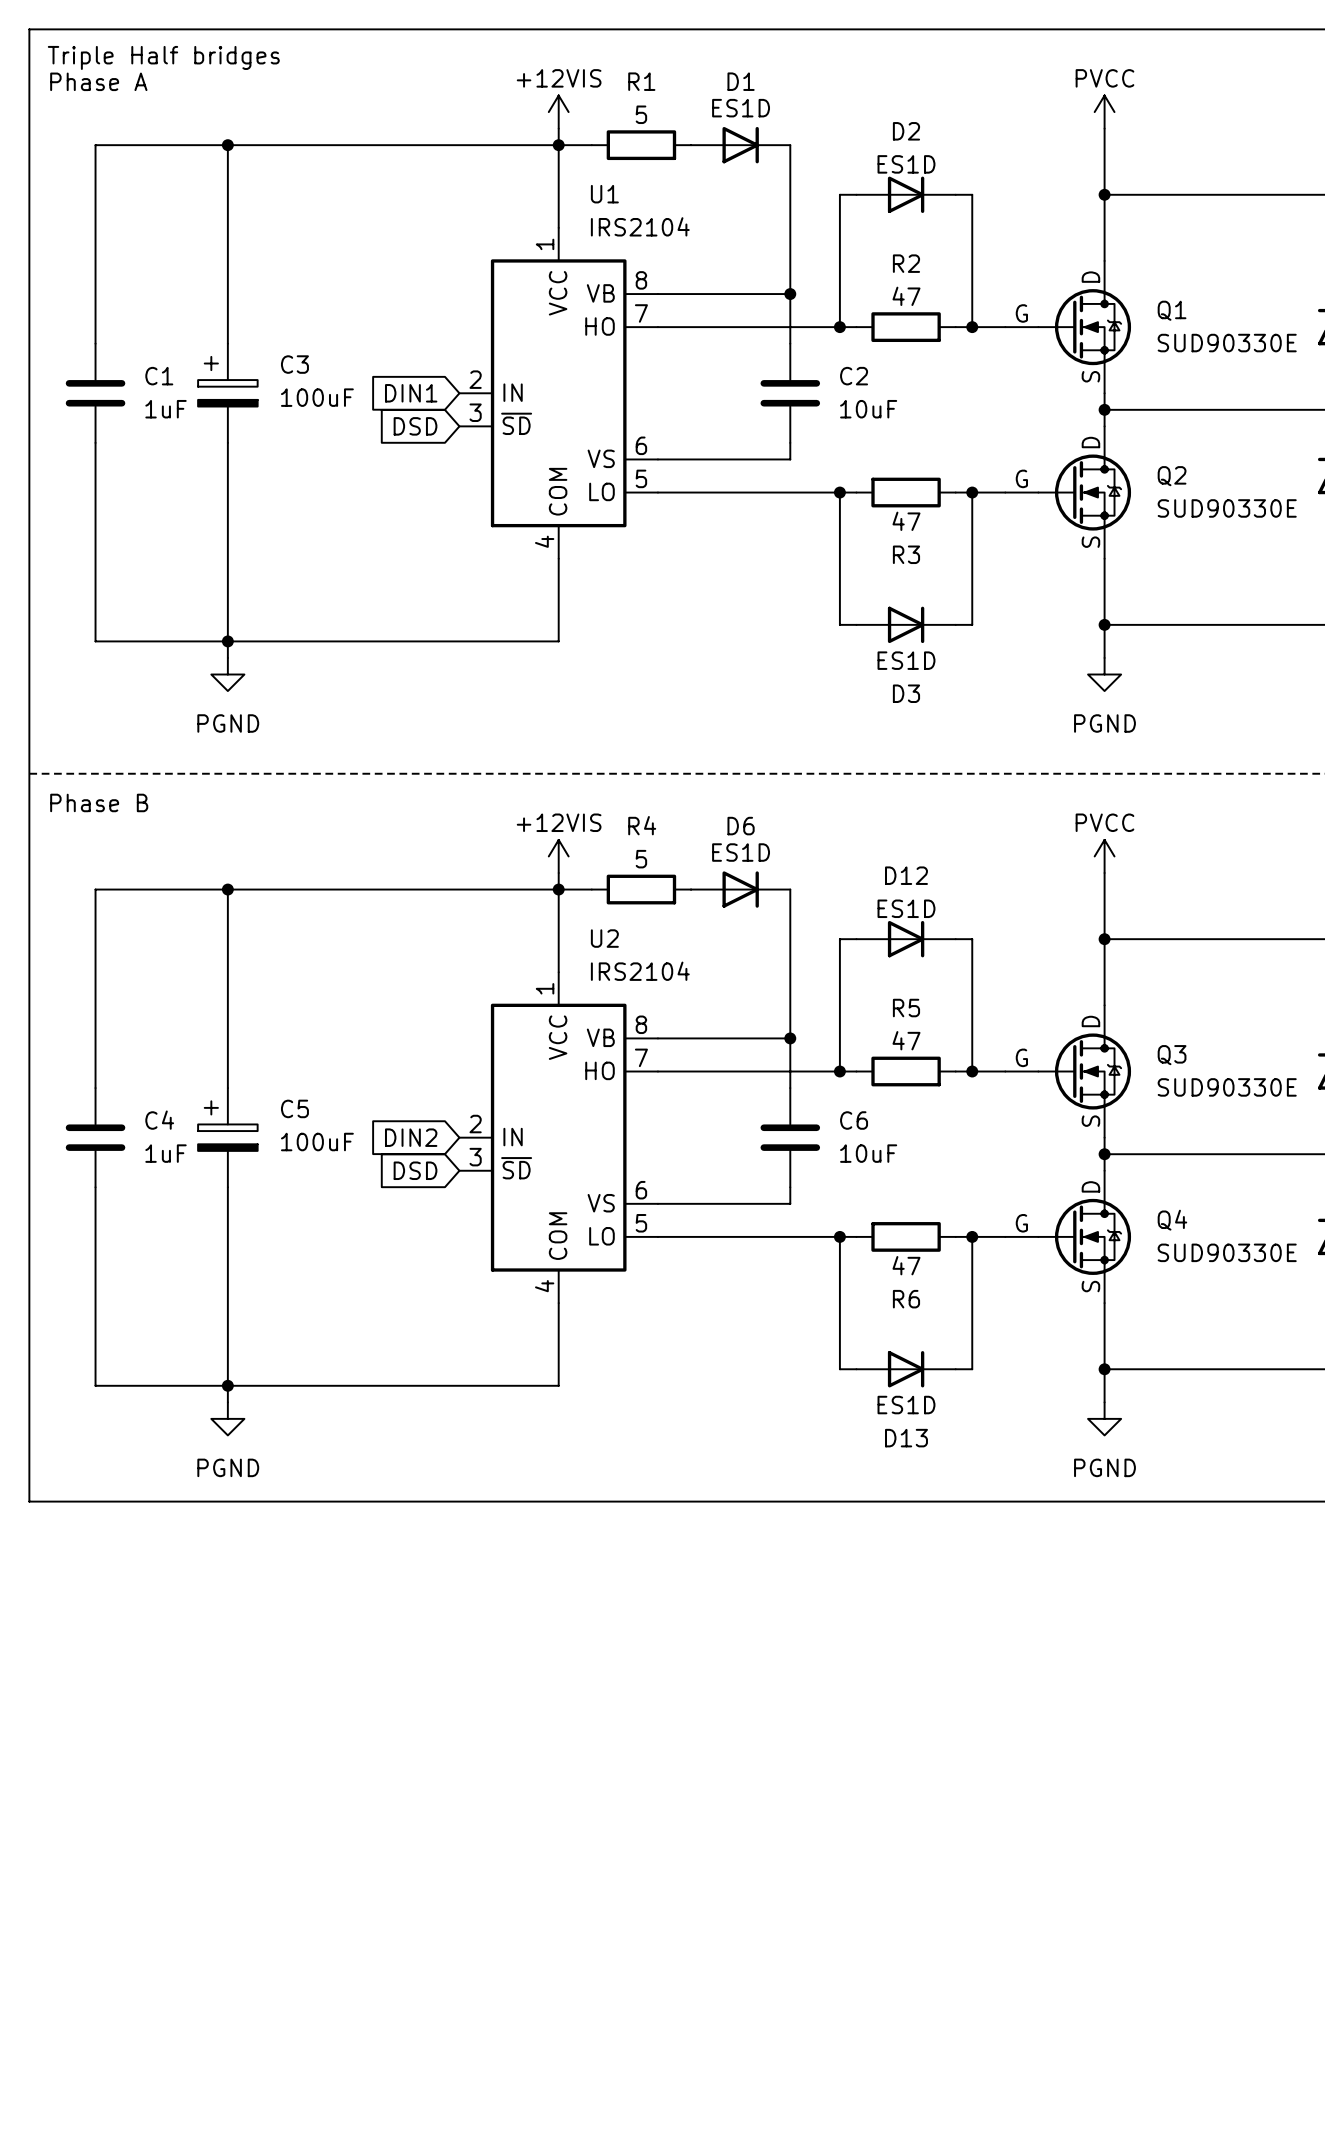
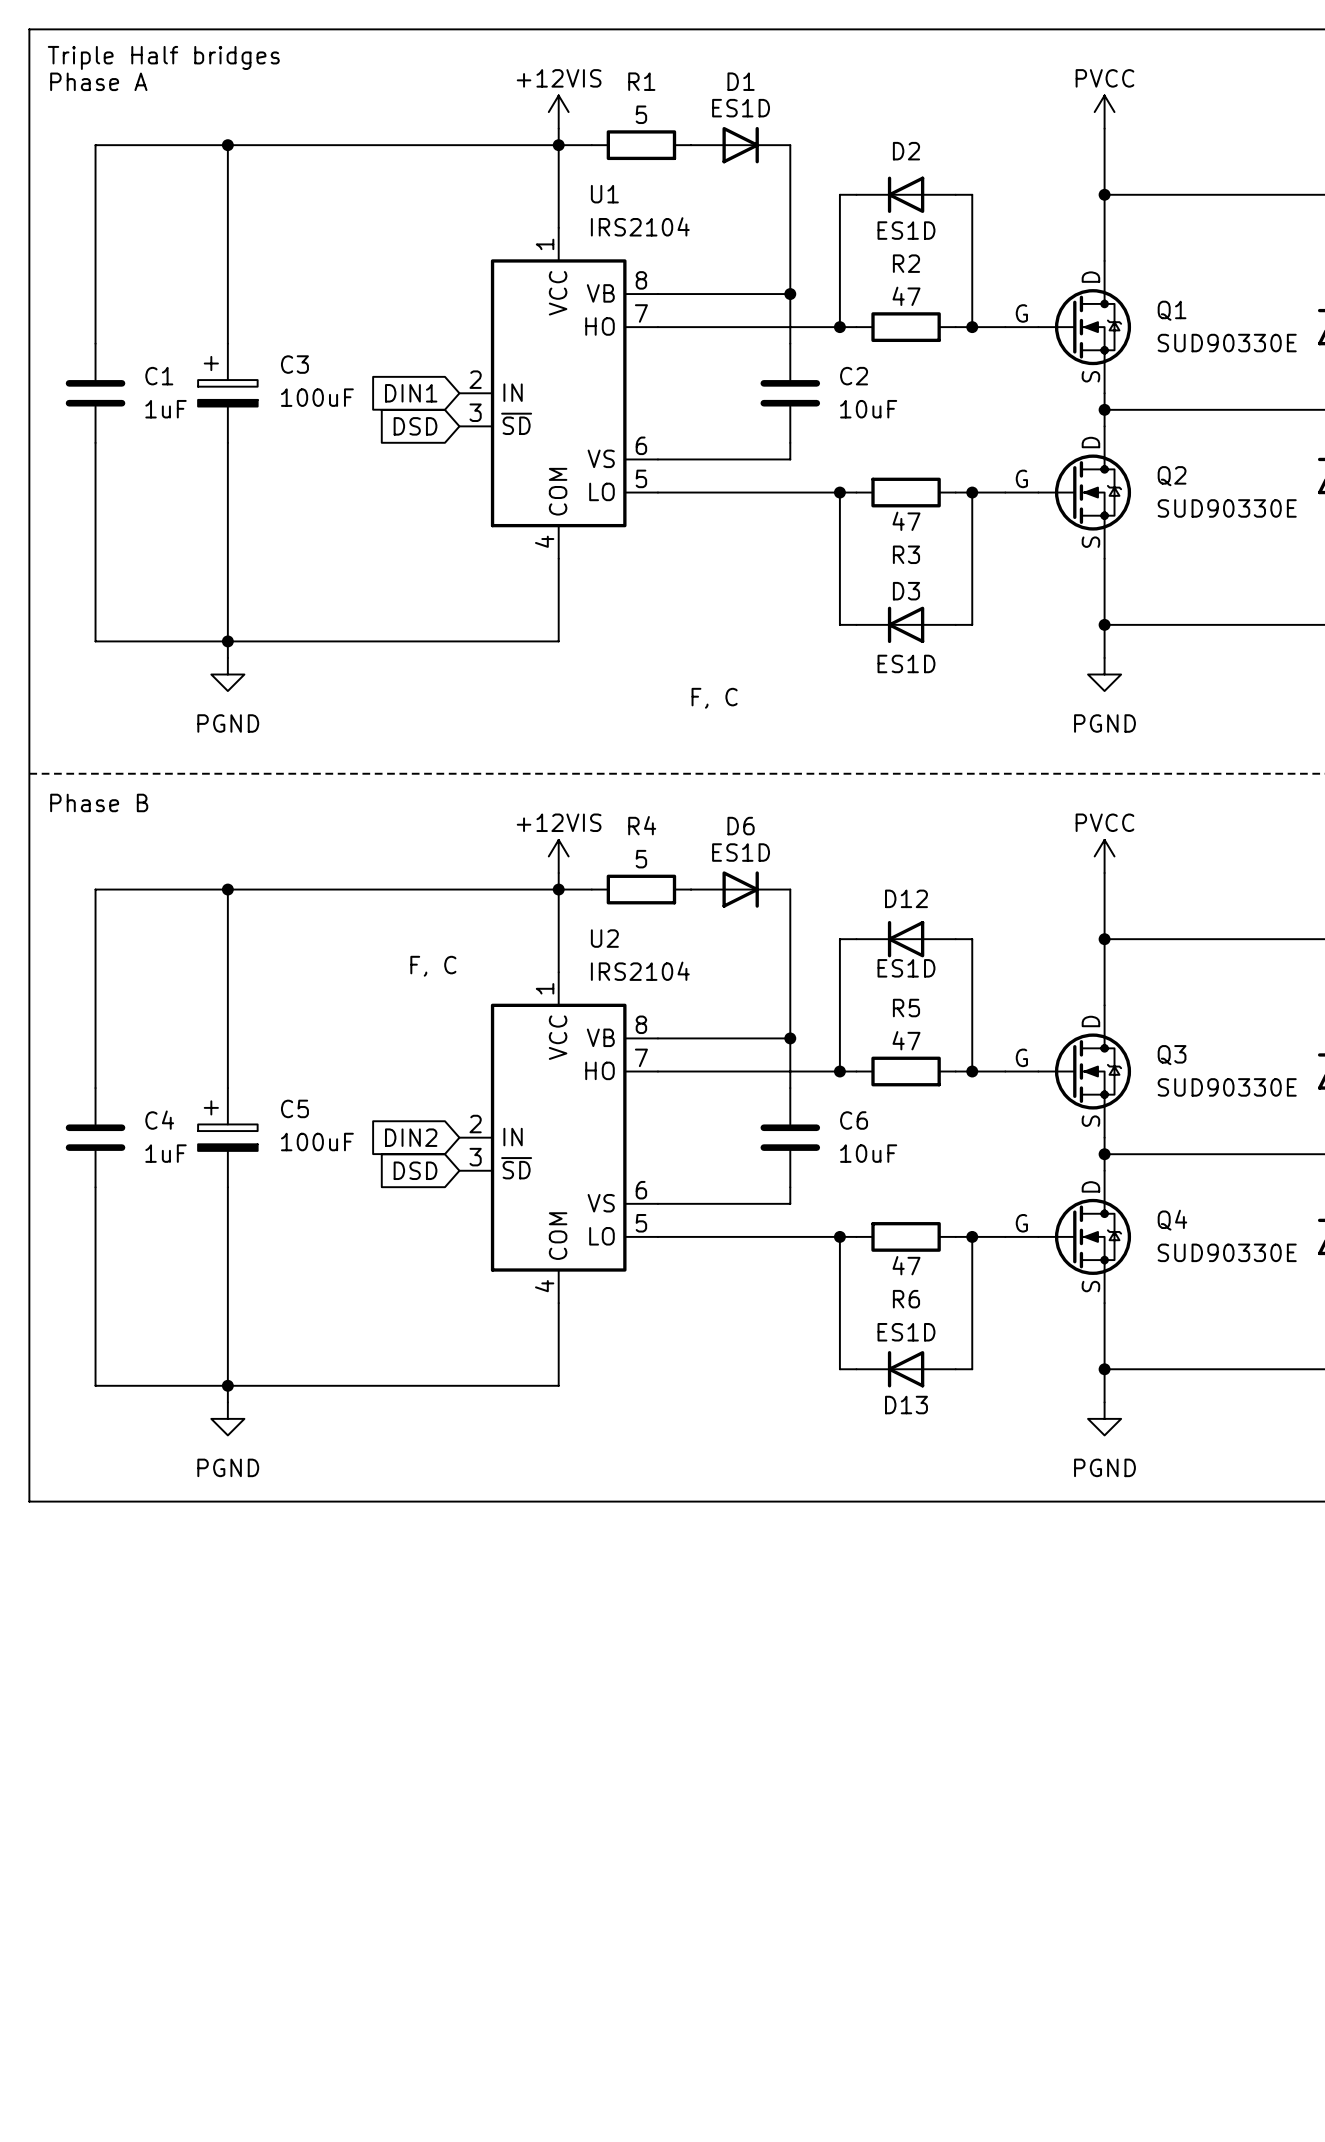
D2 rotation: 0° (906, 194) -> 180° (906, 194)
D3 rotation: 0° (906, 624) -> 180° (906, 624)
D3 name position: D3 (906, 693) -> D3 (906, 591)
text: none -> F, C (714, 698)
D12 rotation: 0° (906, 939) -> 180° (906, 939)
text: none -> F, C (433, 966)
D13 rotation: 0° (906, 1369) -> 180° (906, 1369)
D13 name position: D13 (906, 1438) -> D13 (906, 1405)

